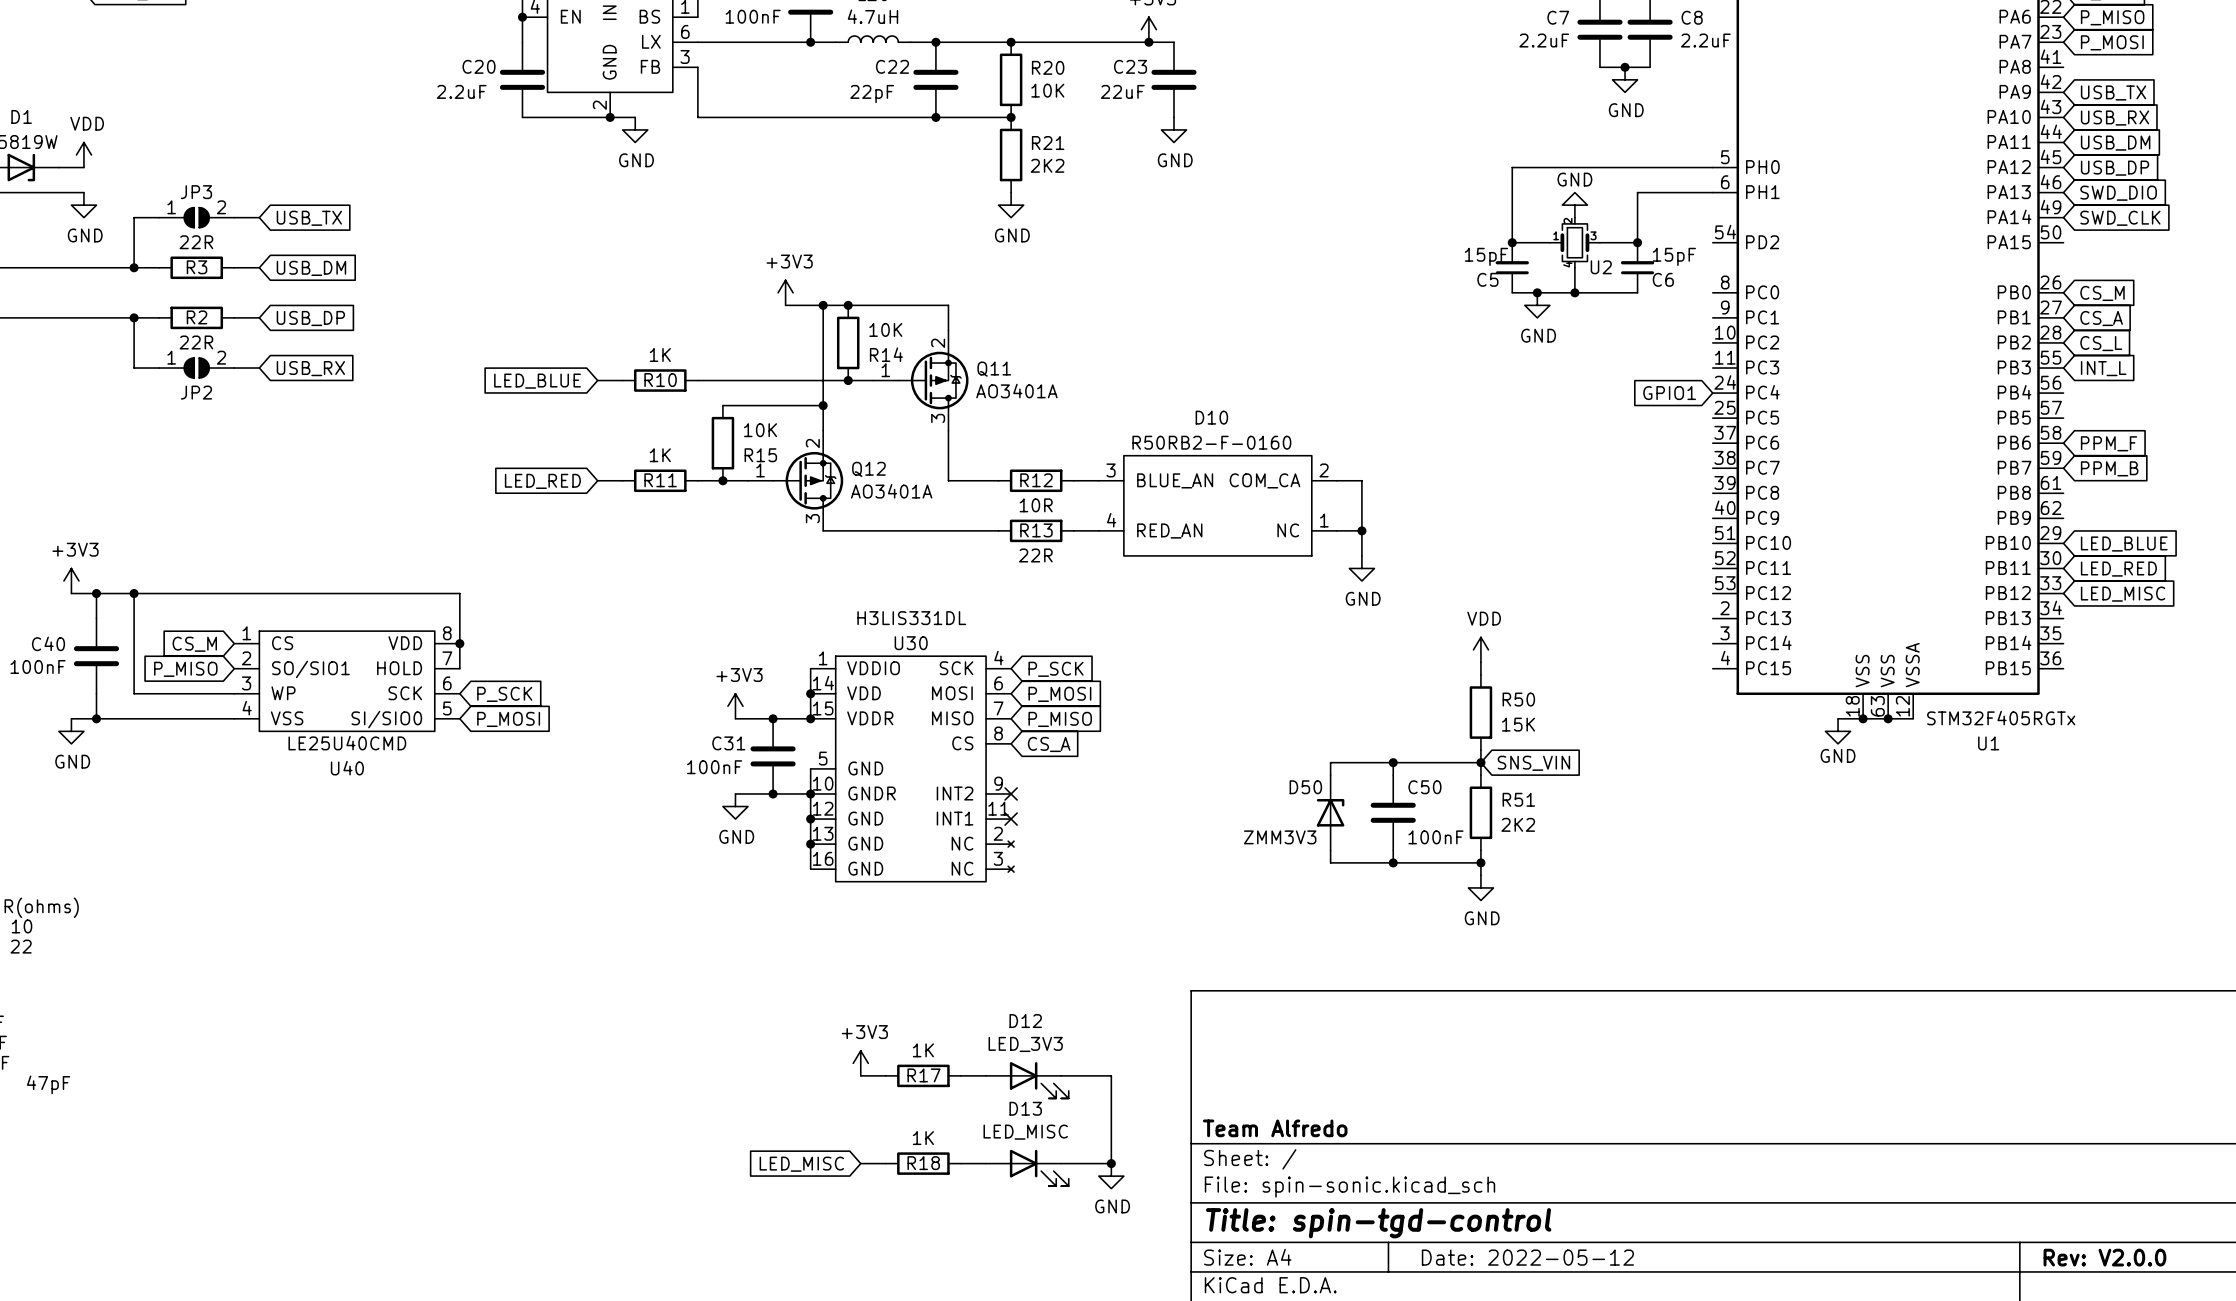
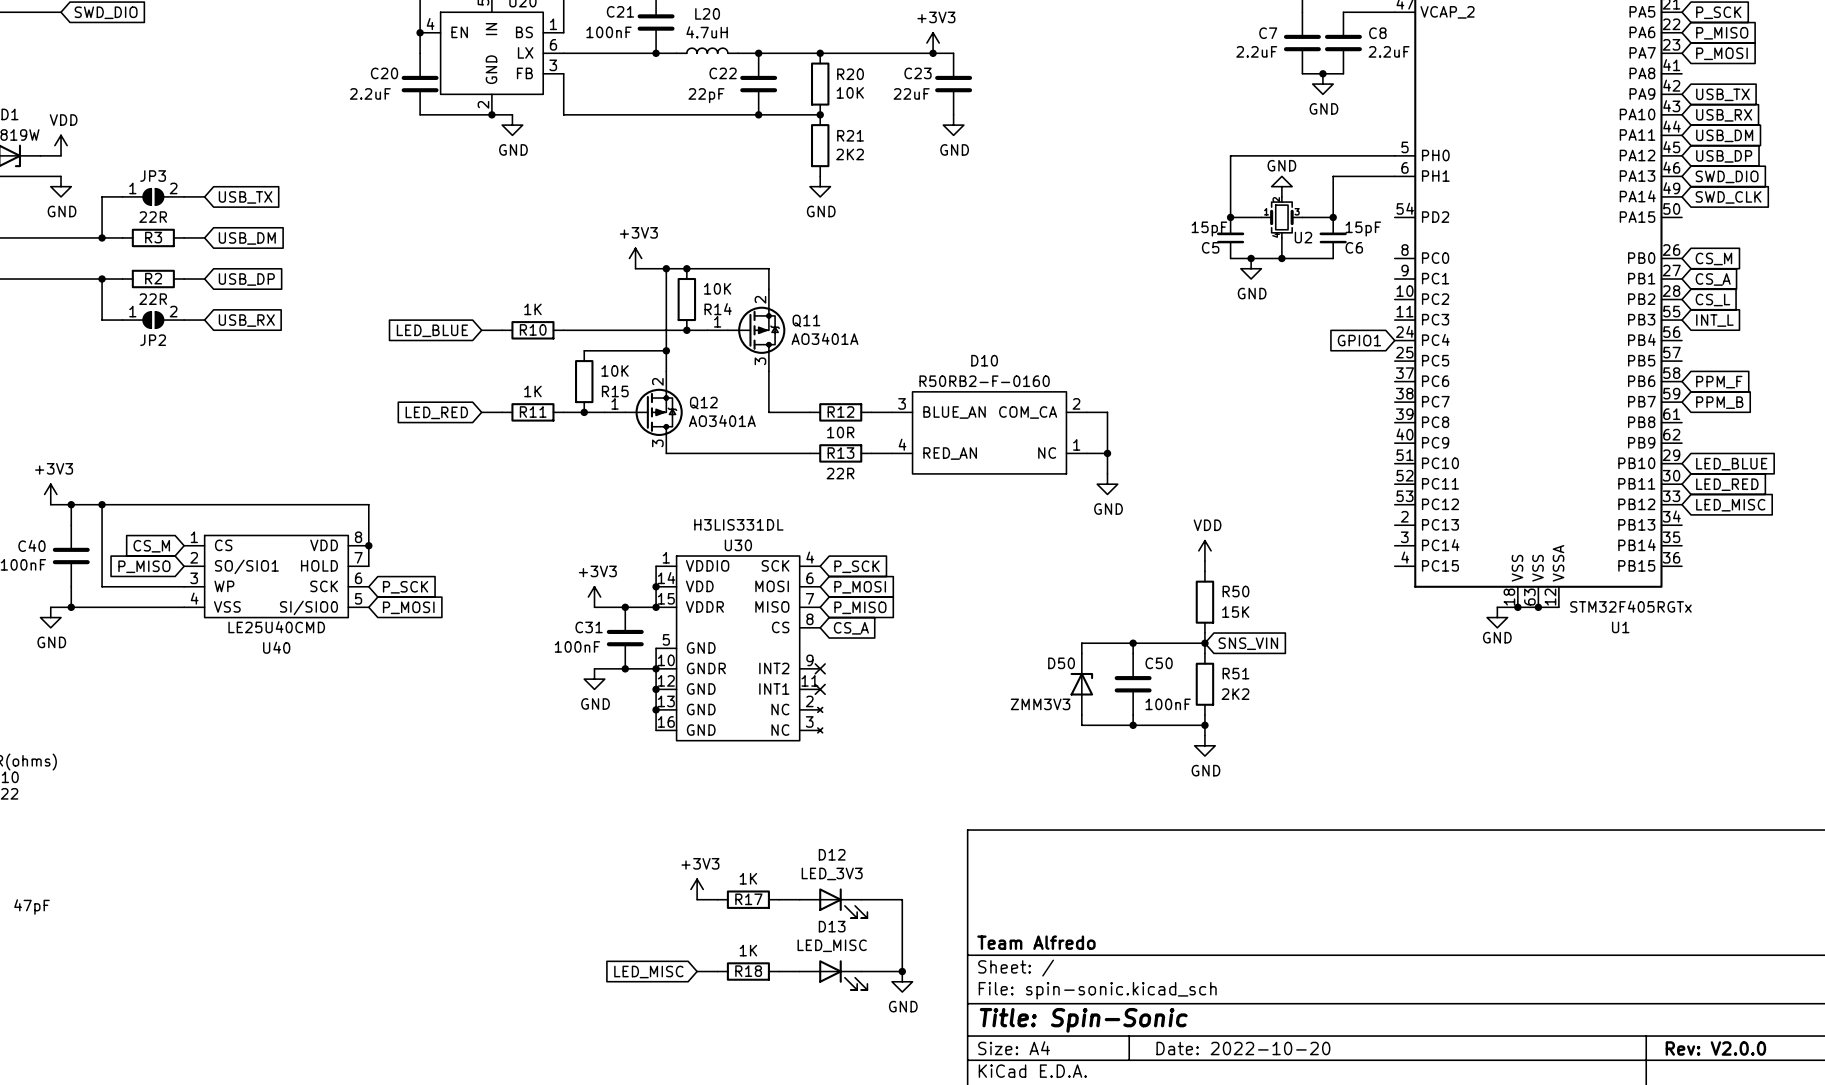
title block: Title: spin-tgd-control (1378, 1223) -> Title: Spin-Sonic (1083, 1020)
title block: Date: 2022-05-12 (1527, 1257) -> Date: 2022-10-20 (1243, 1048)

